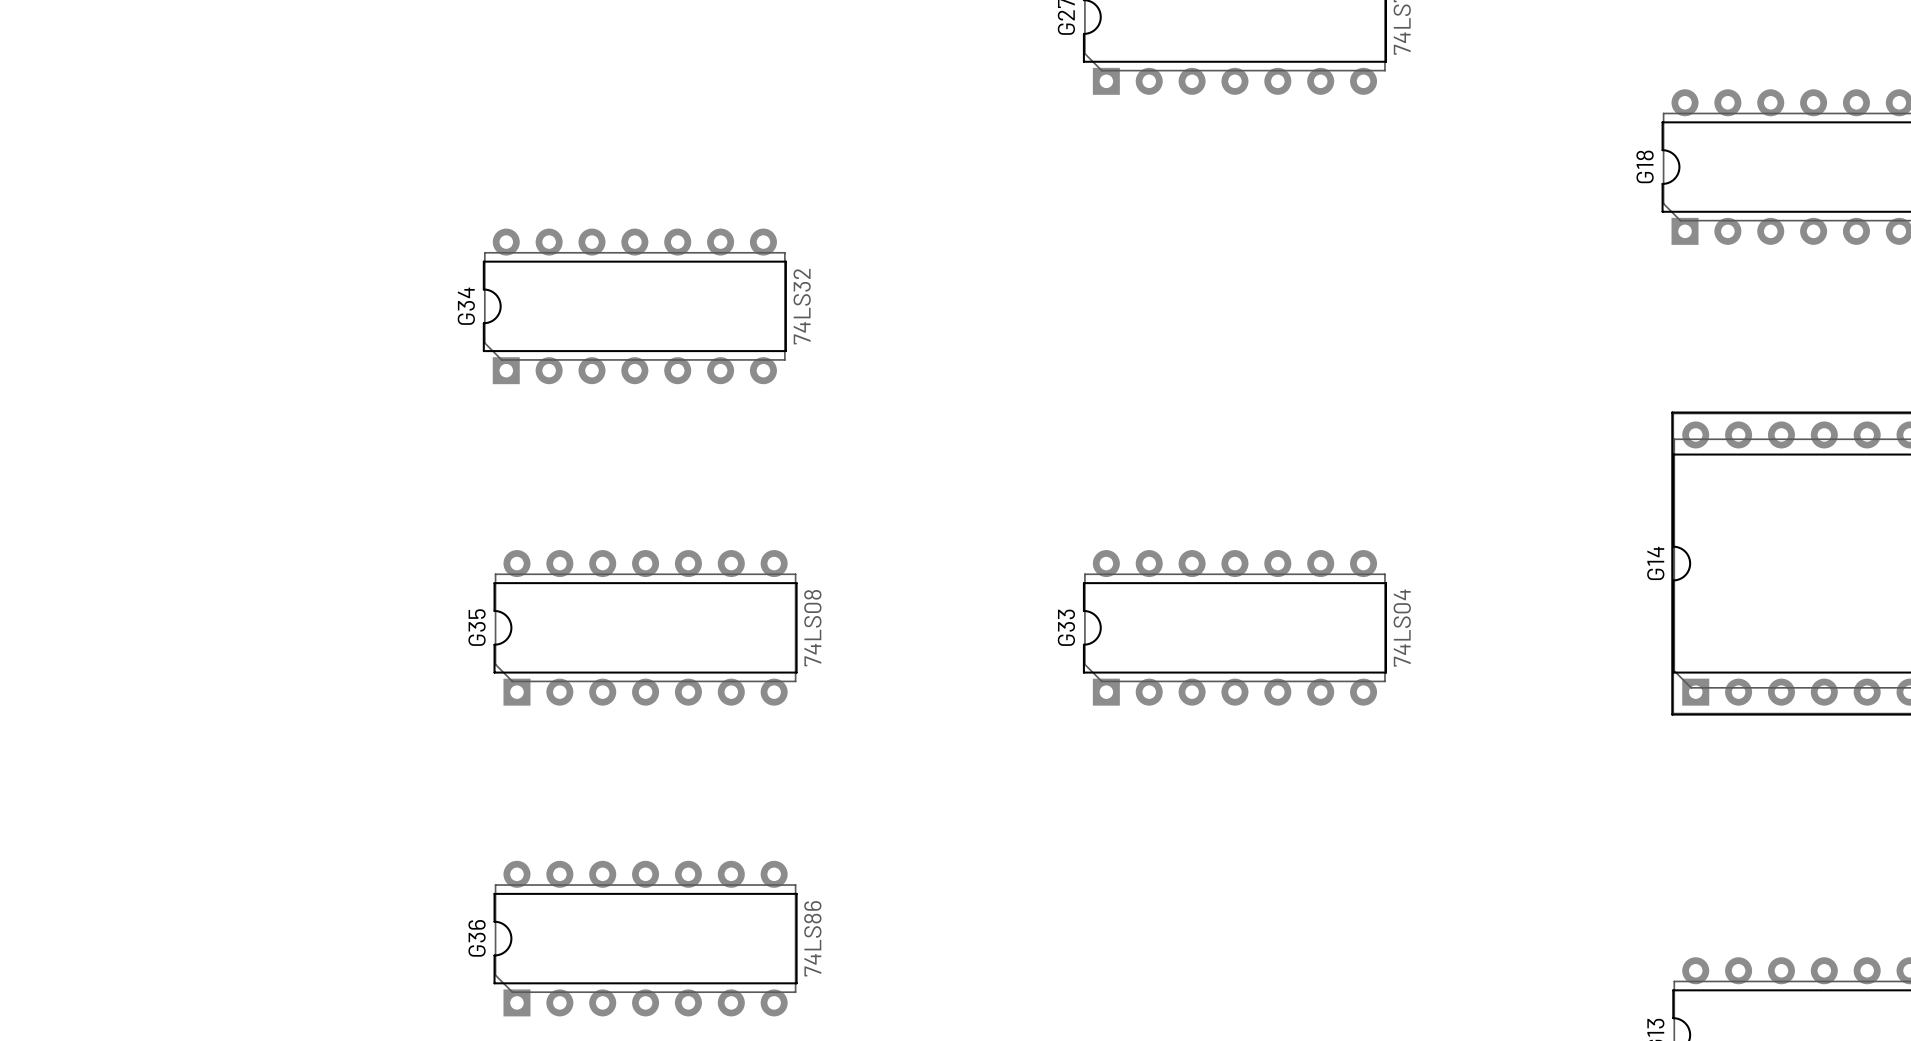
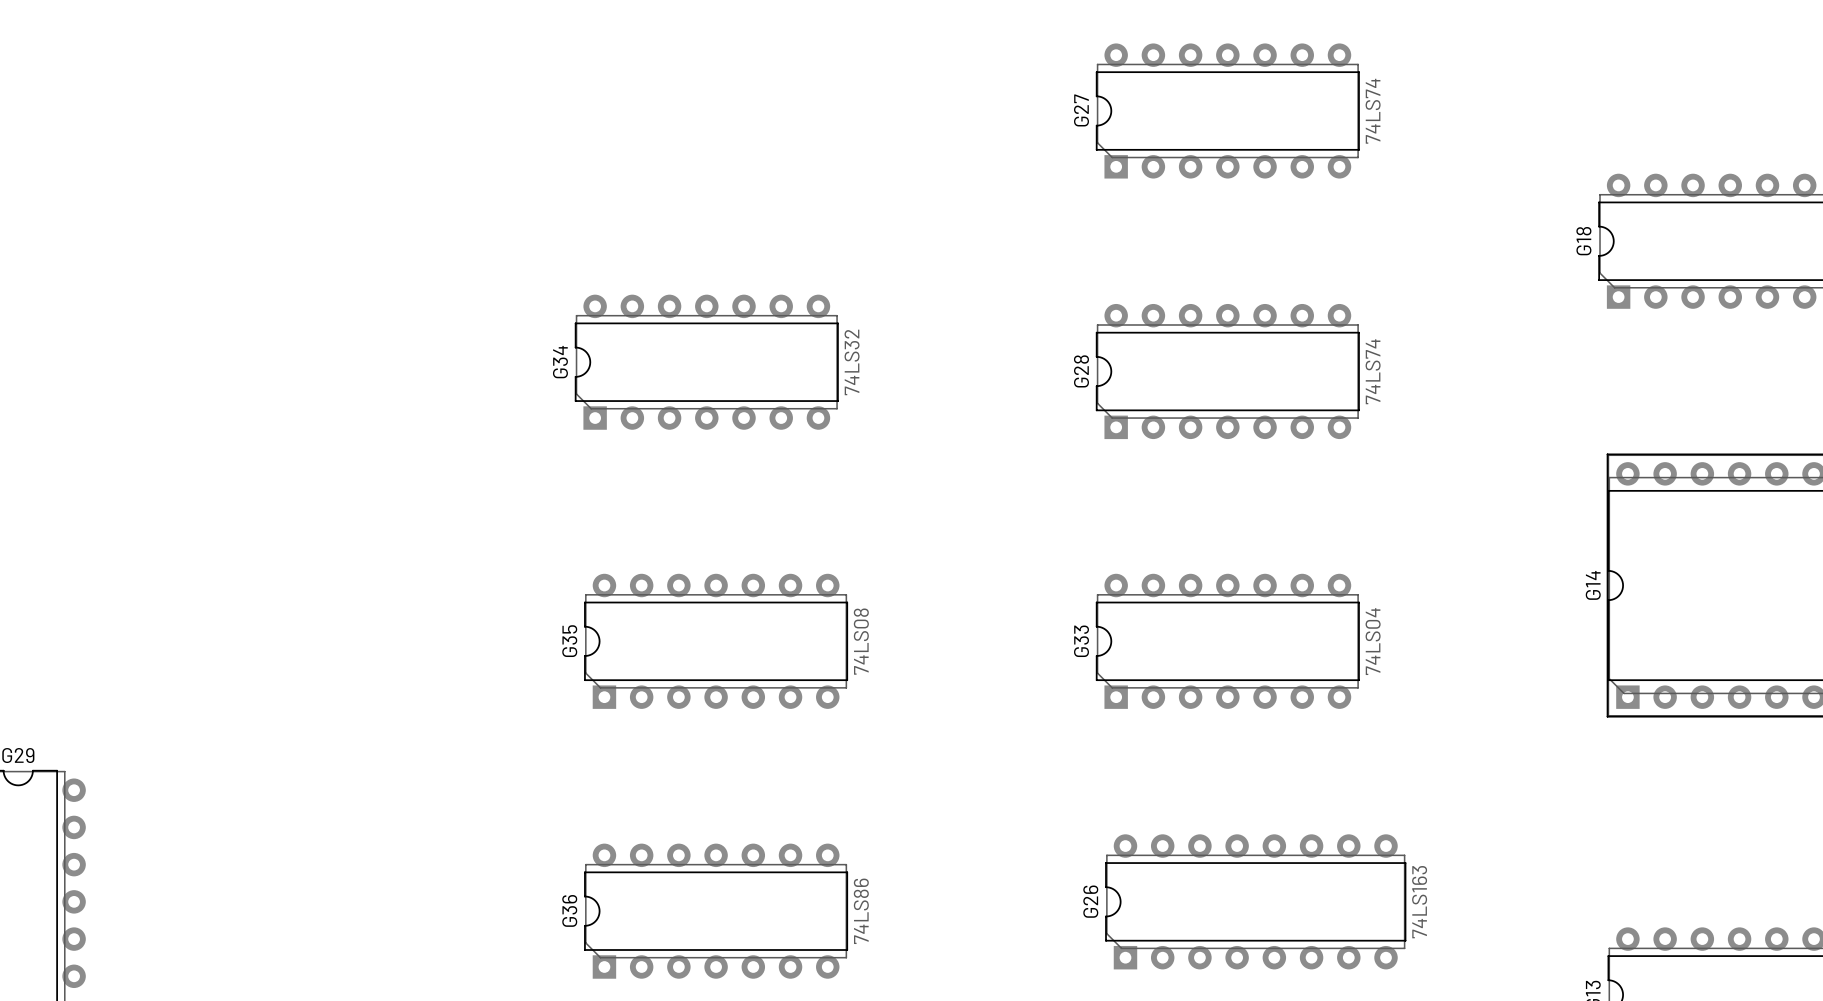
G28: none -> 74LS74 (1227, 371)
G26: none -> 74LS163 (1255, 901)

